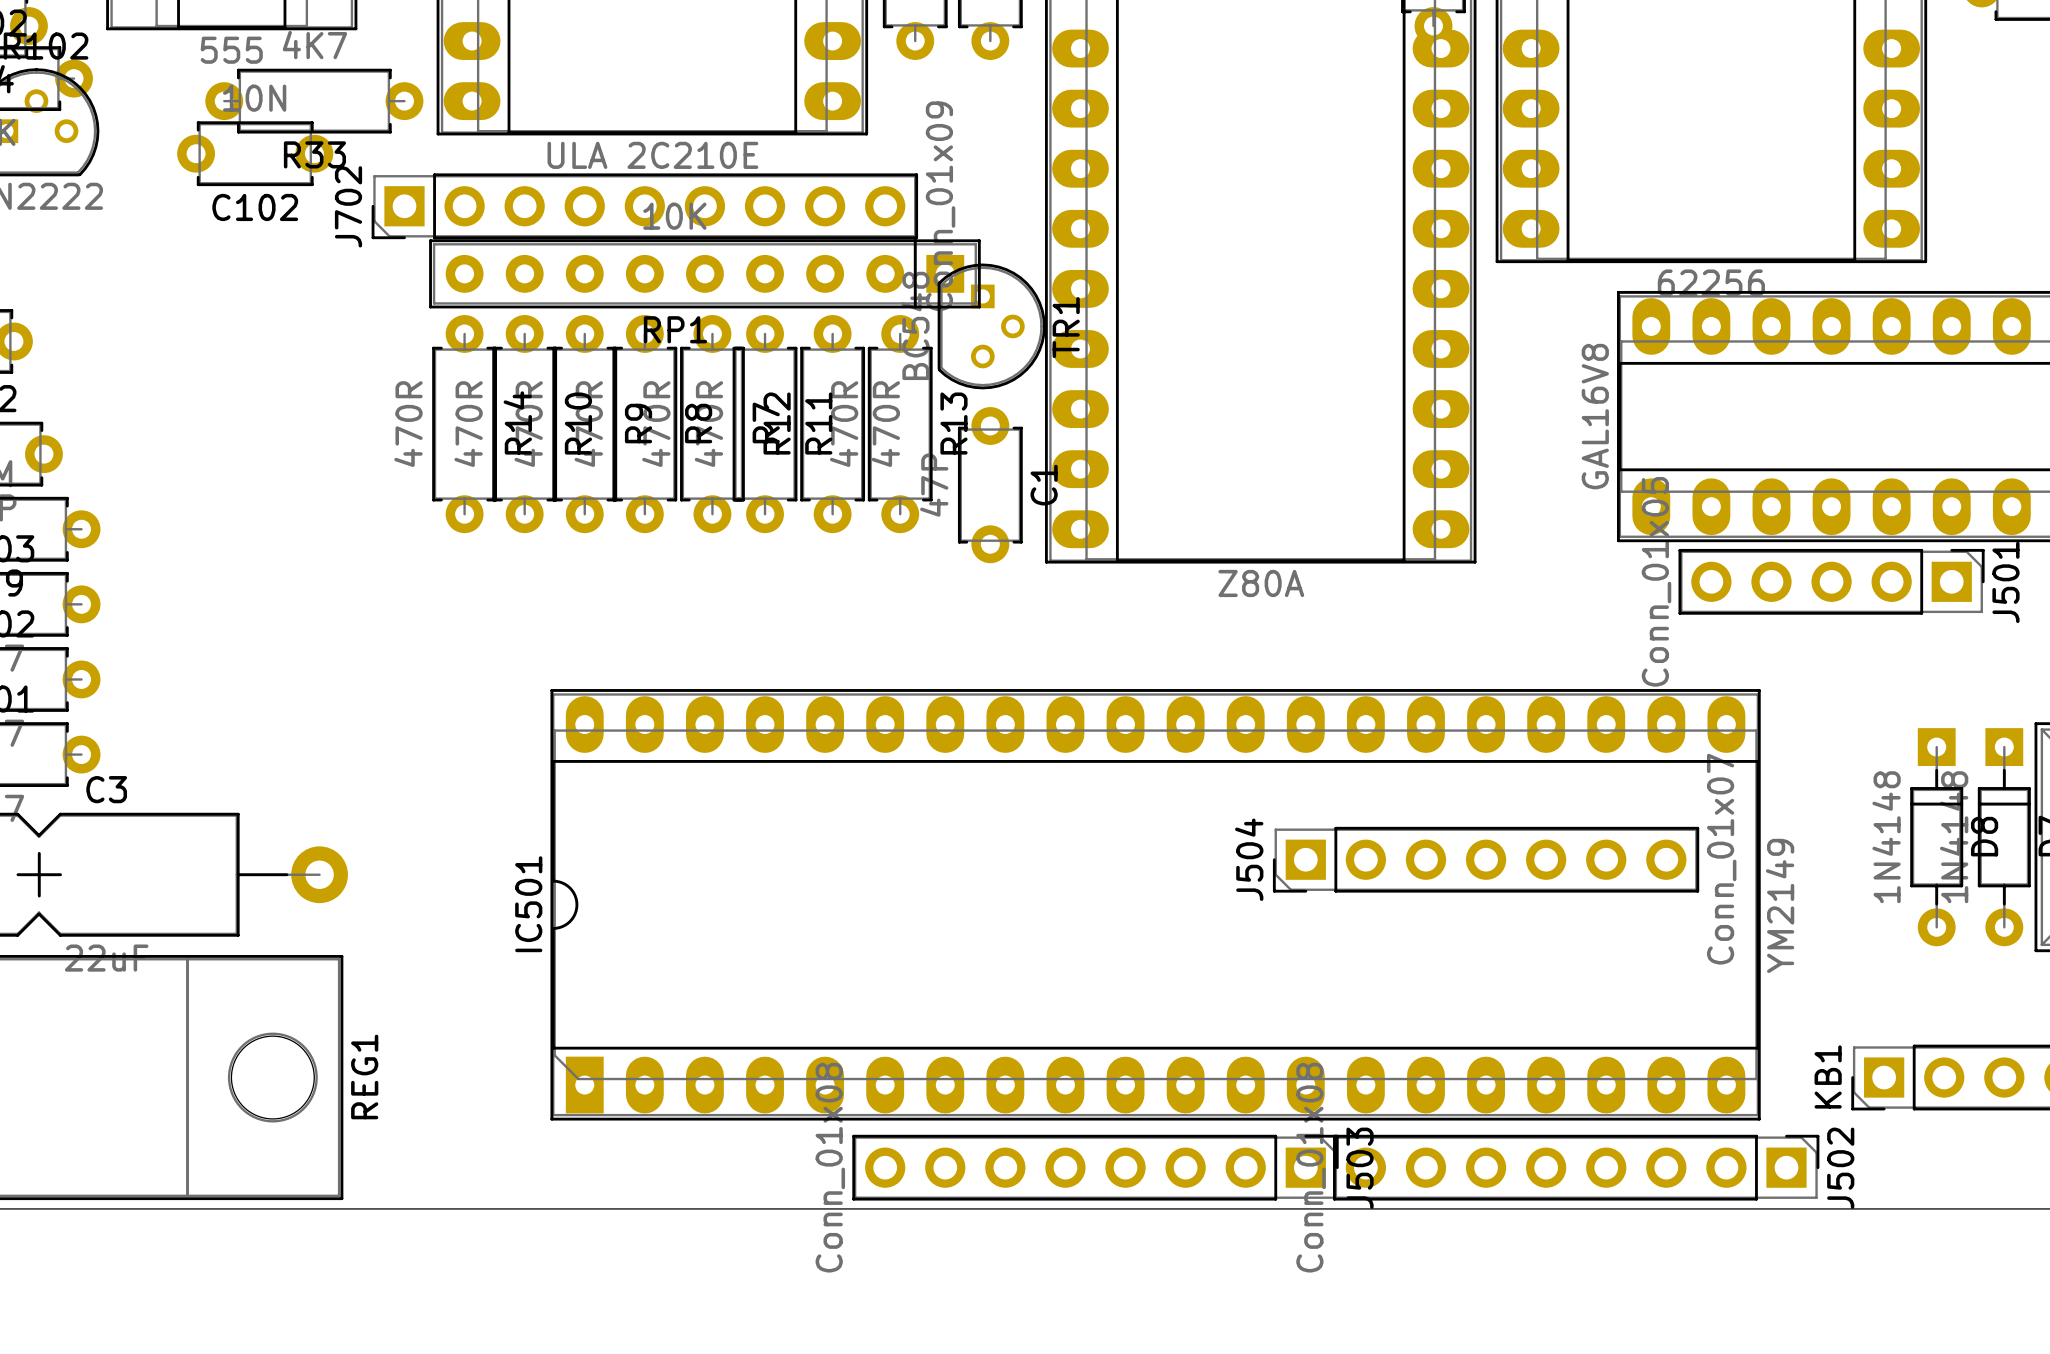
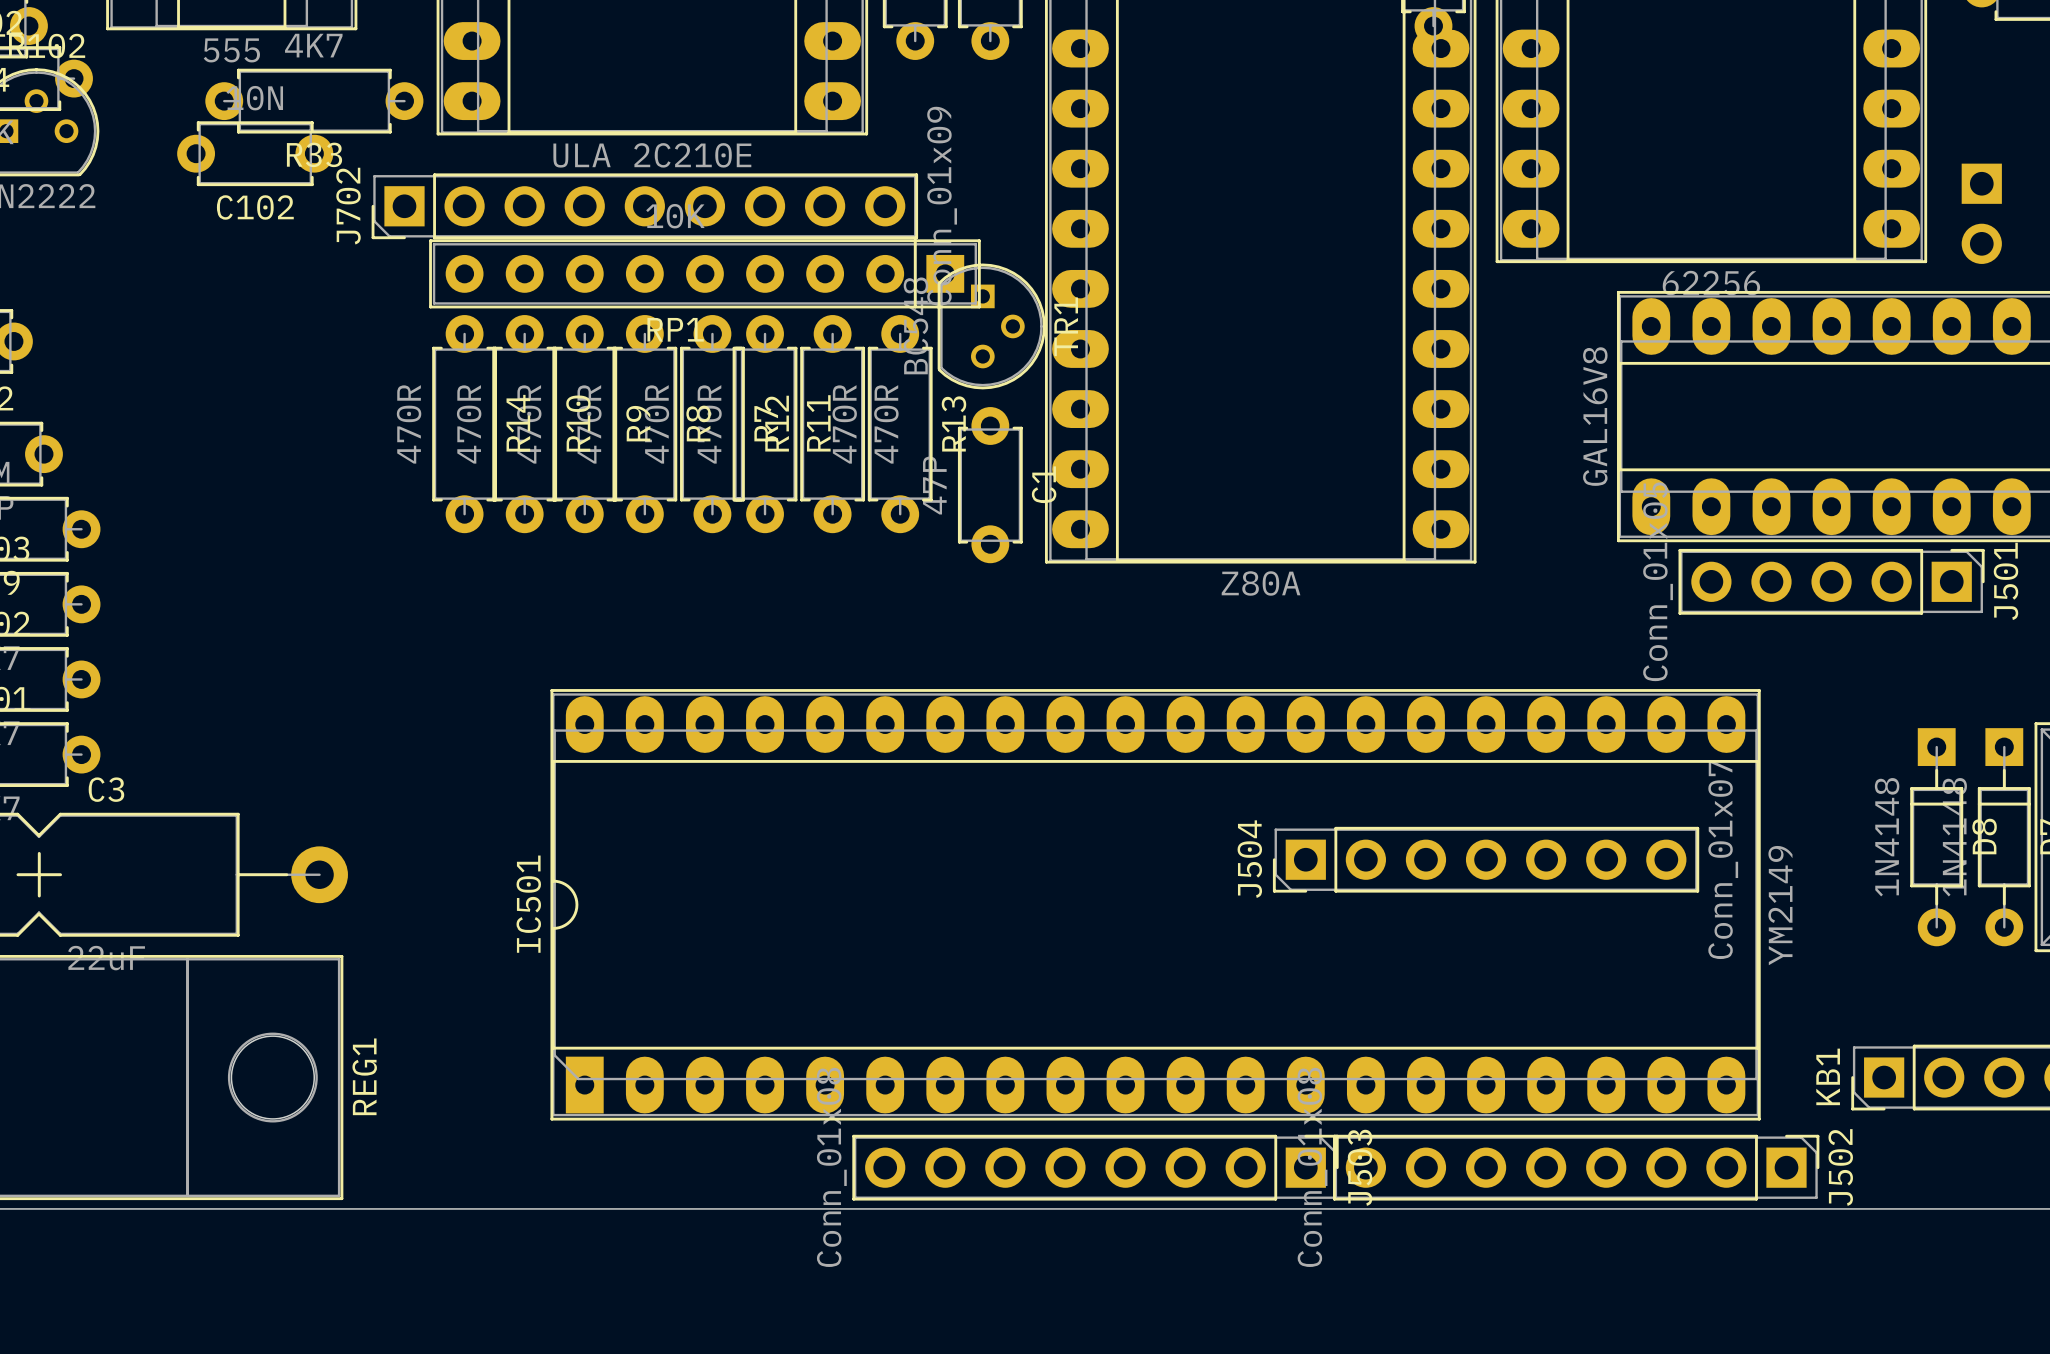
part: none -> (1981, 213)

